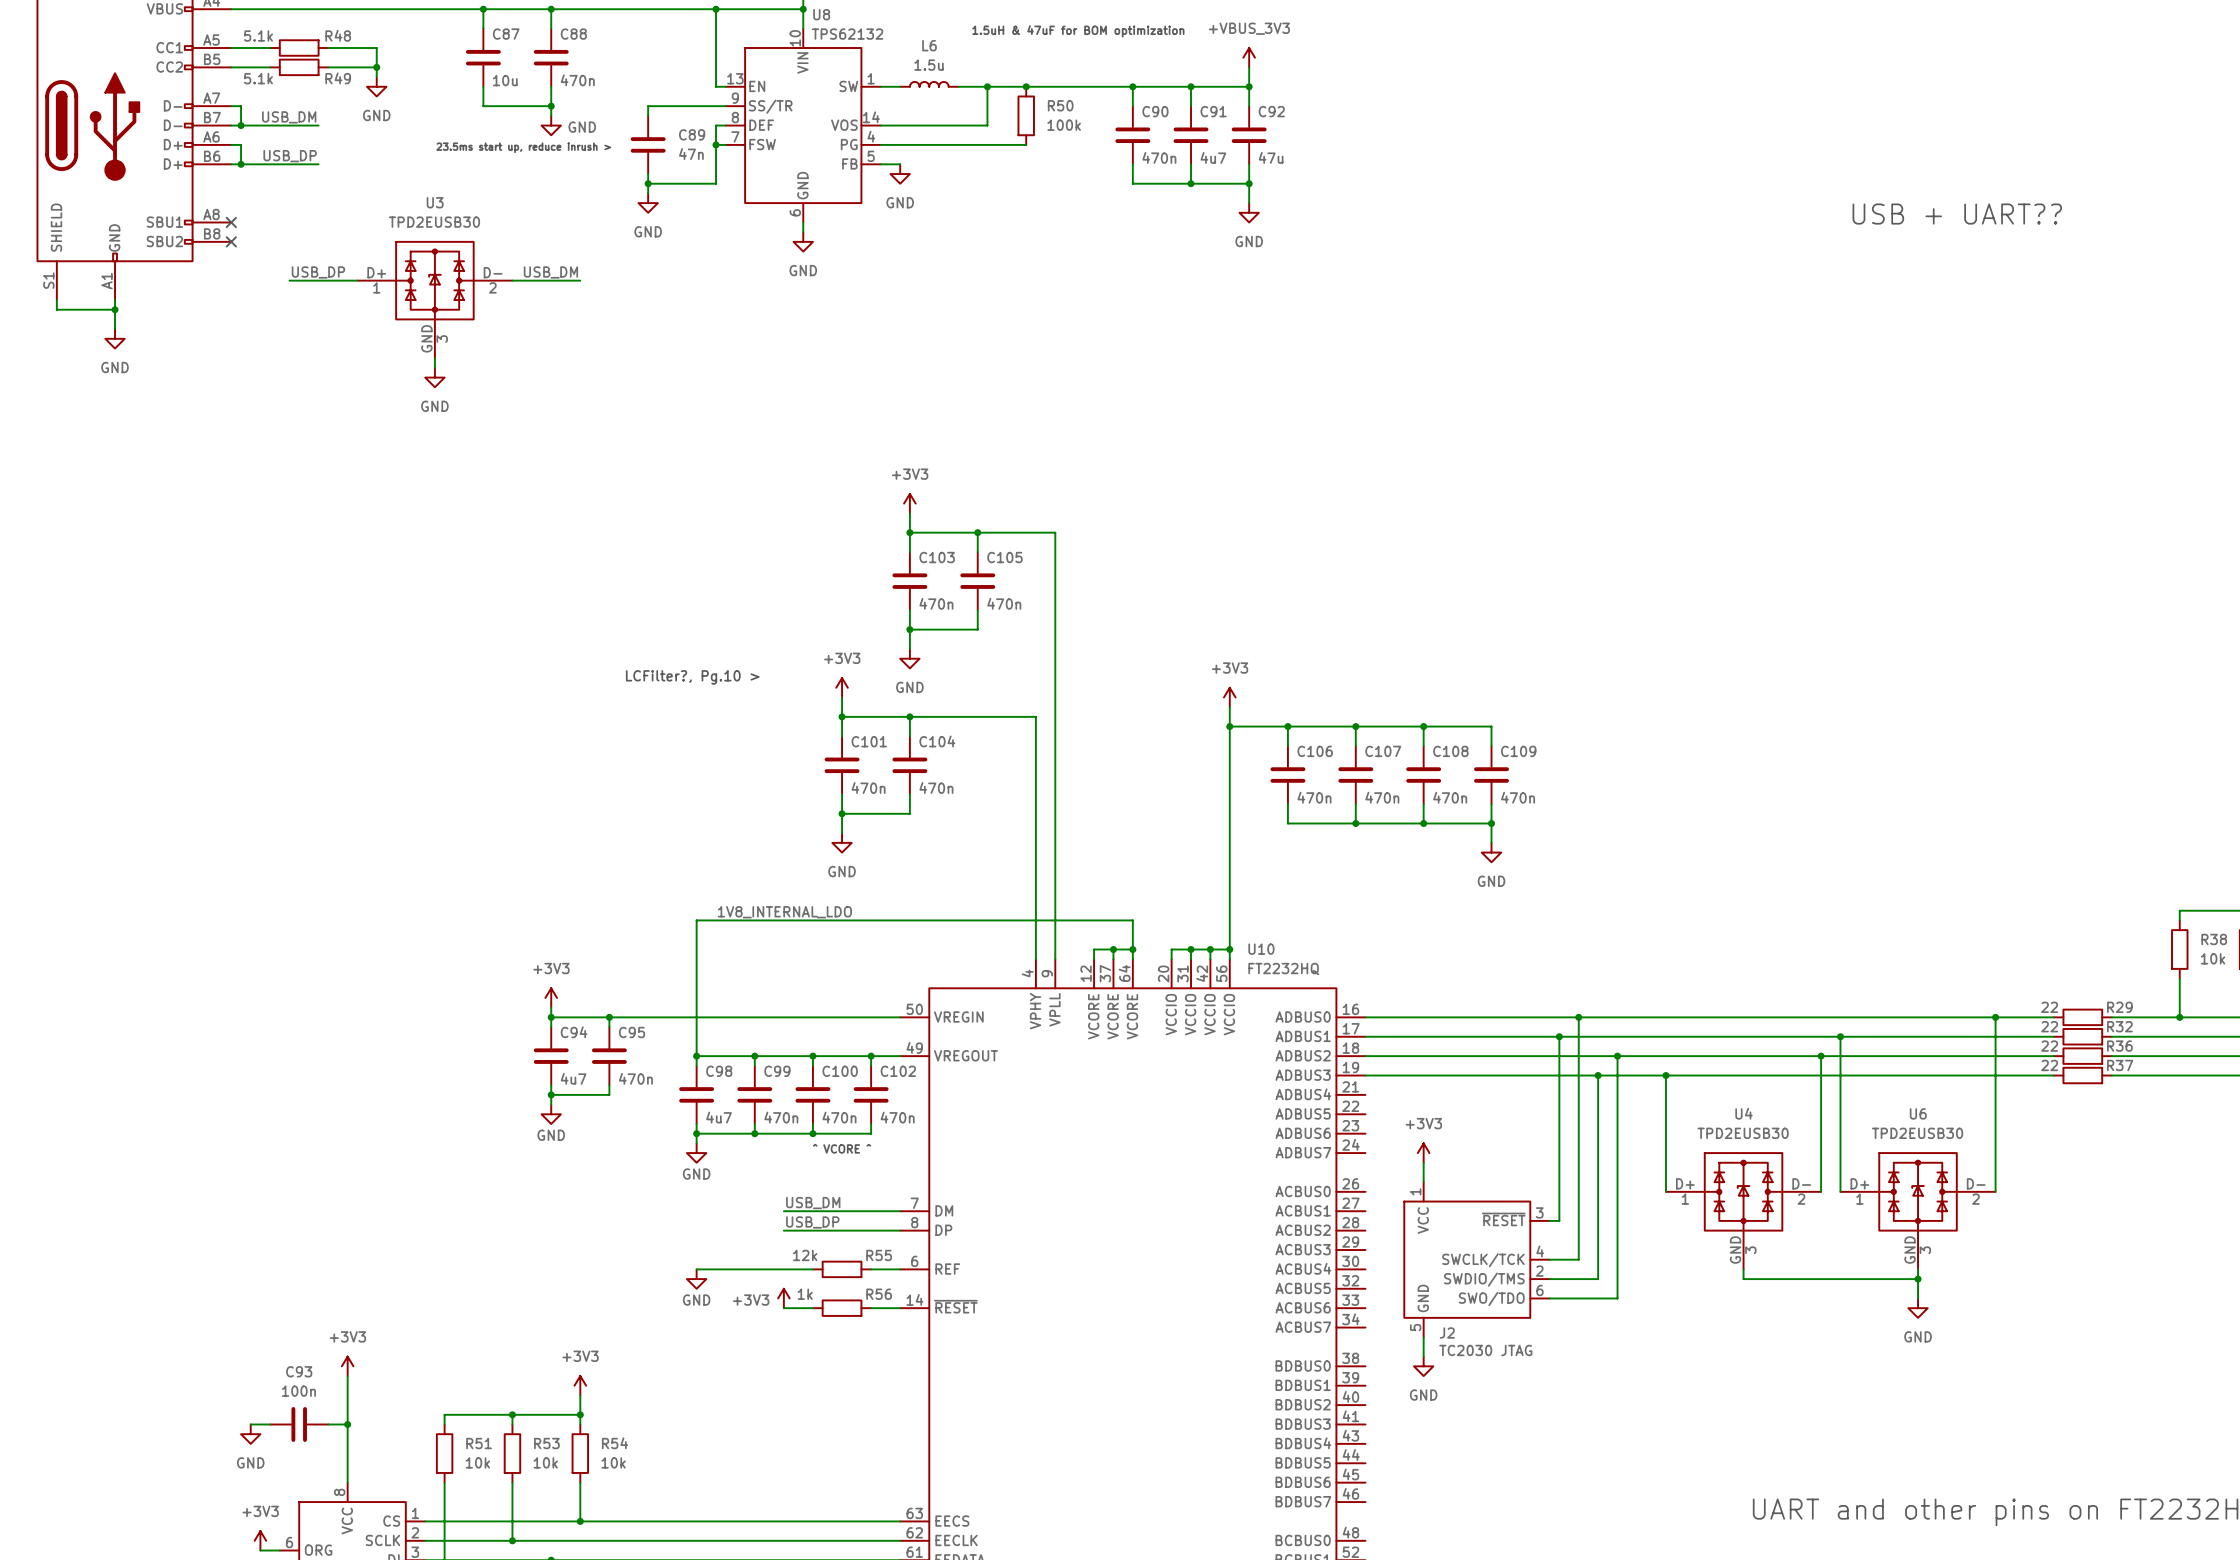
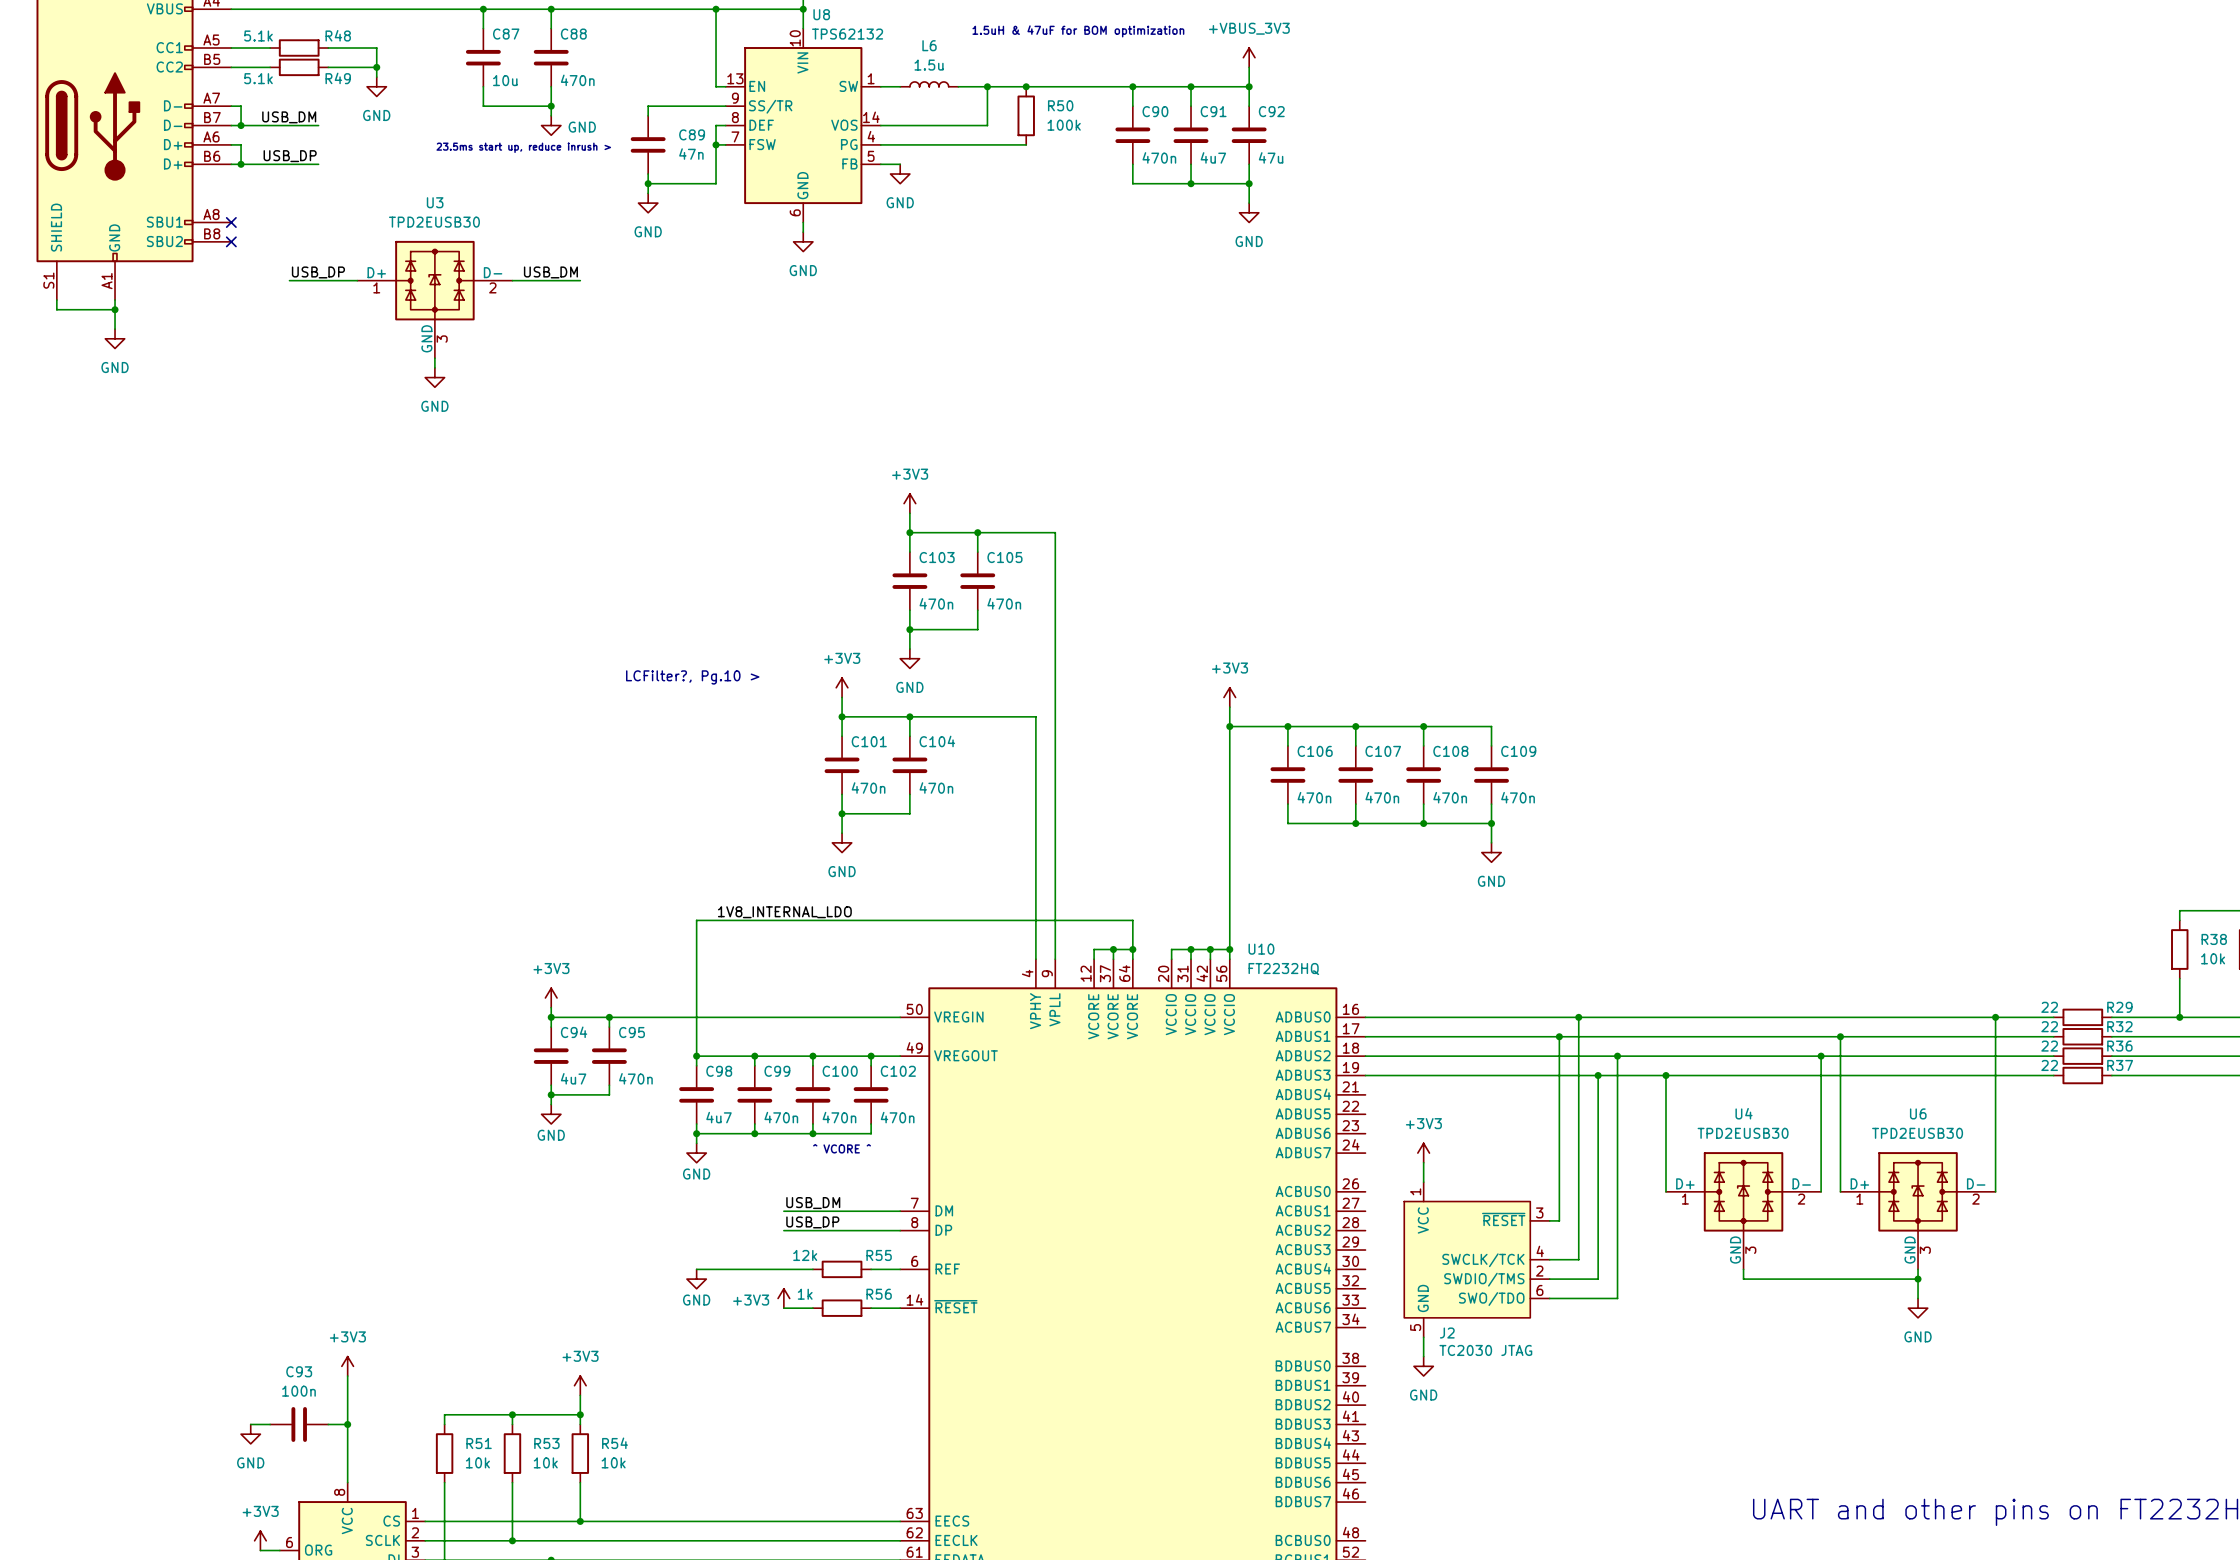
text: USB + UART?? (1957, 214) -> none

